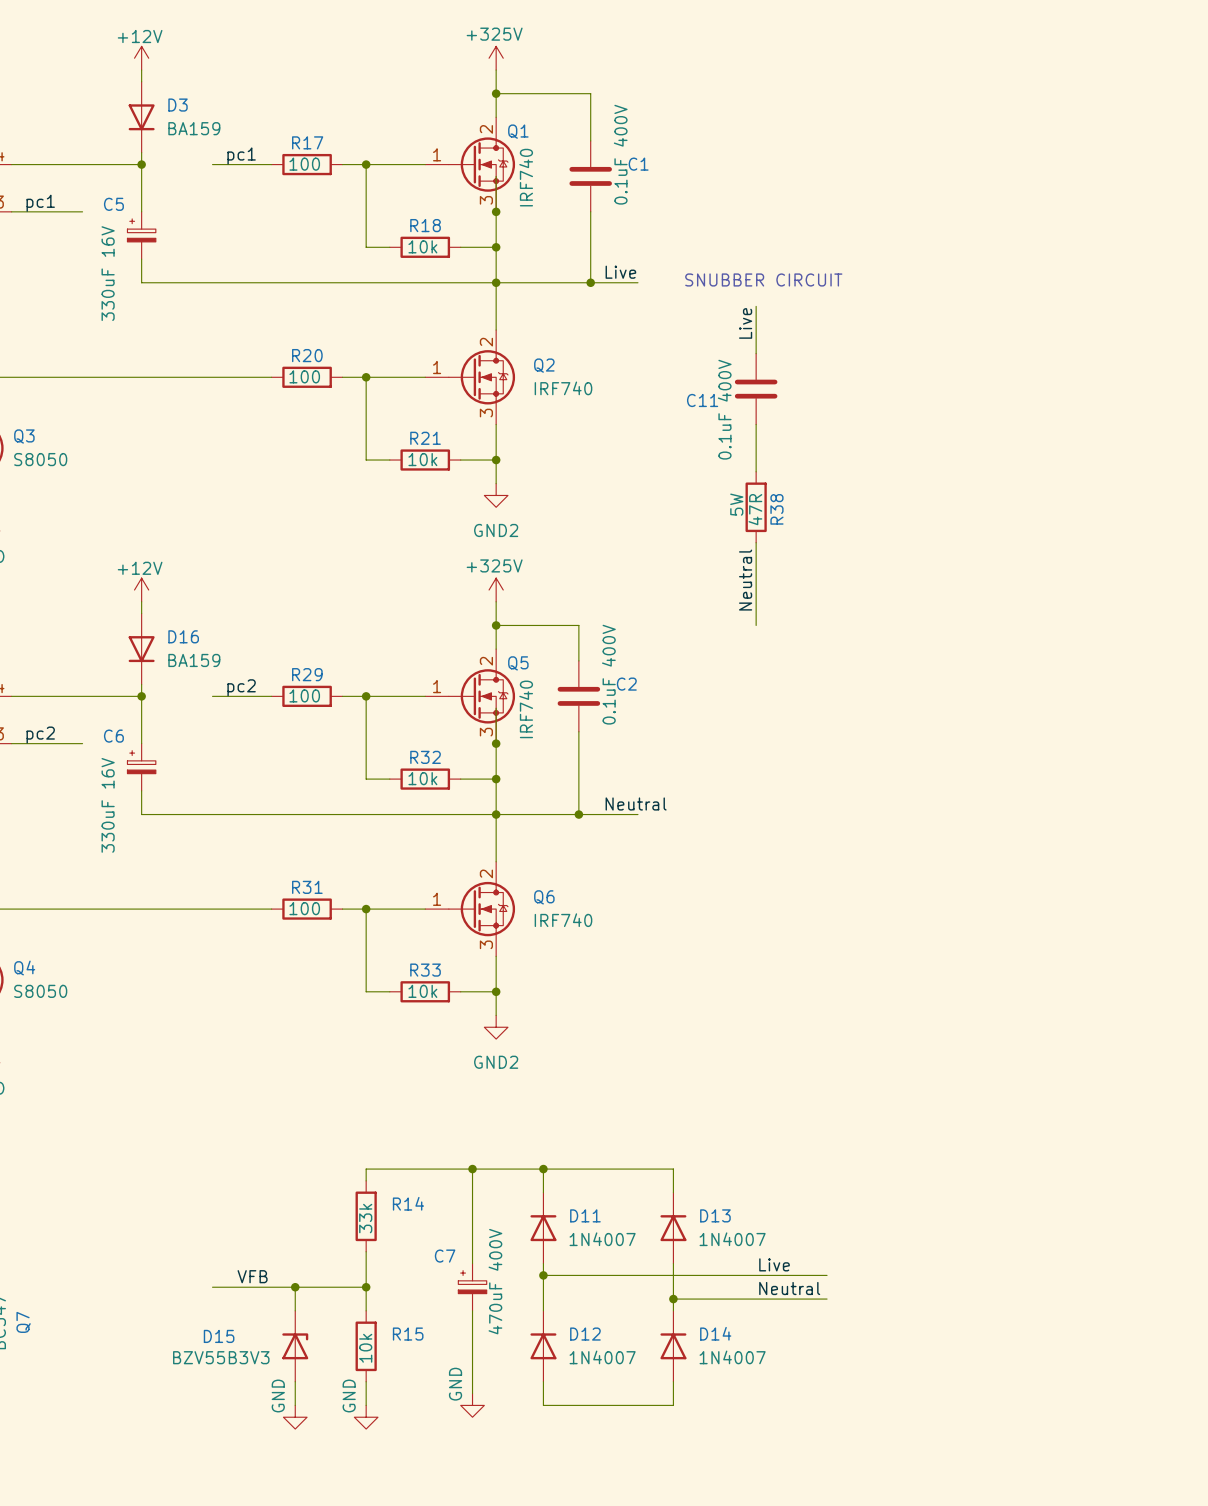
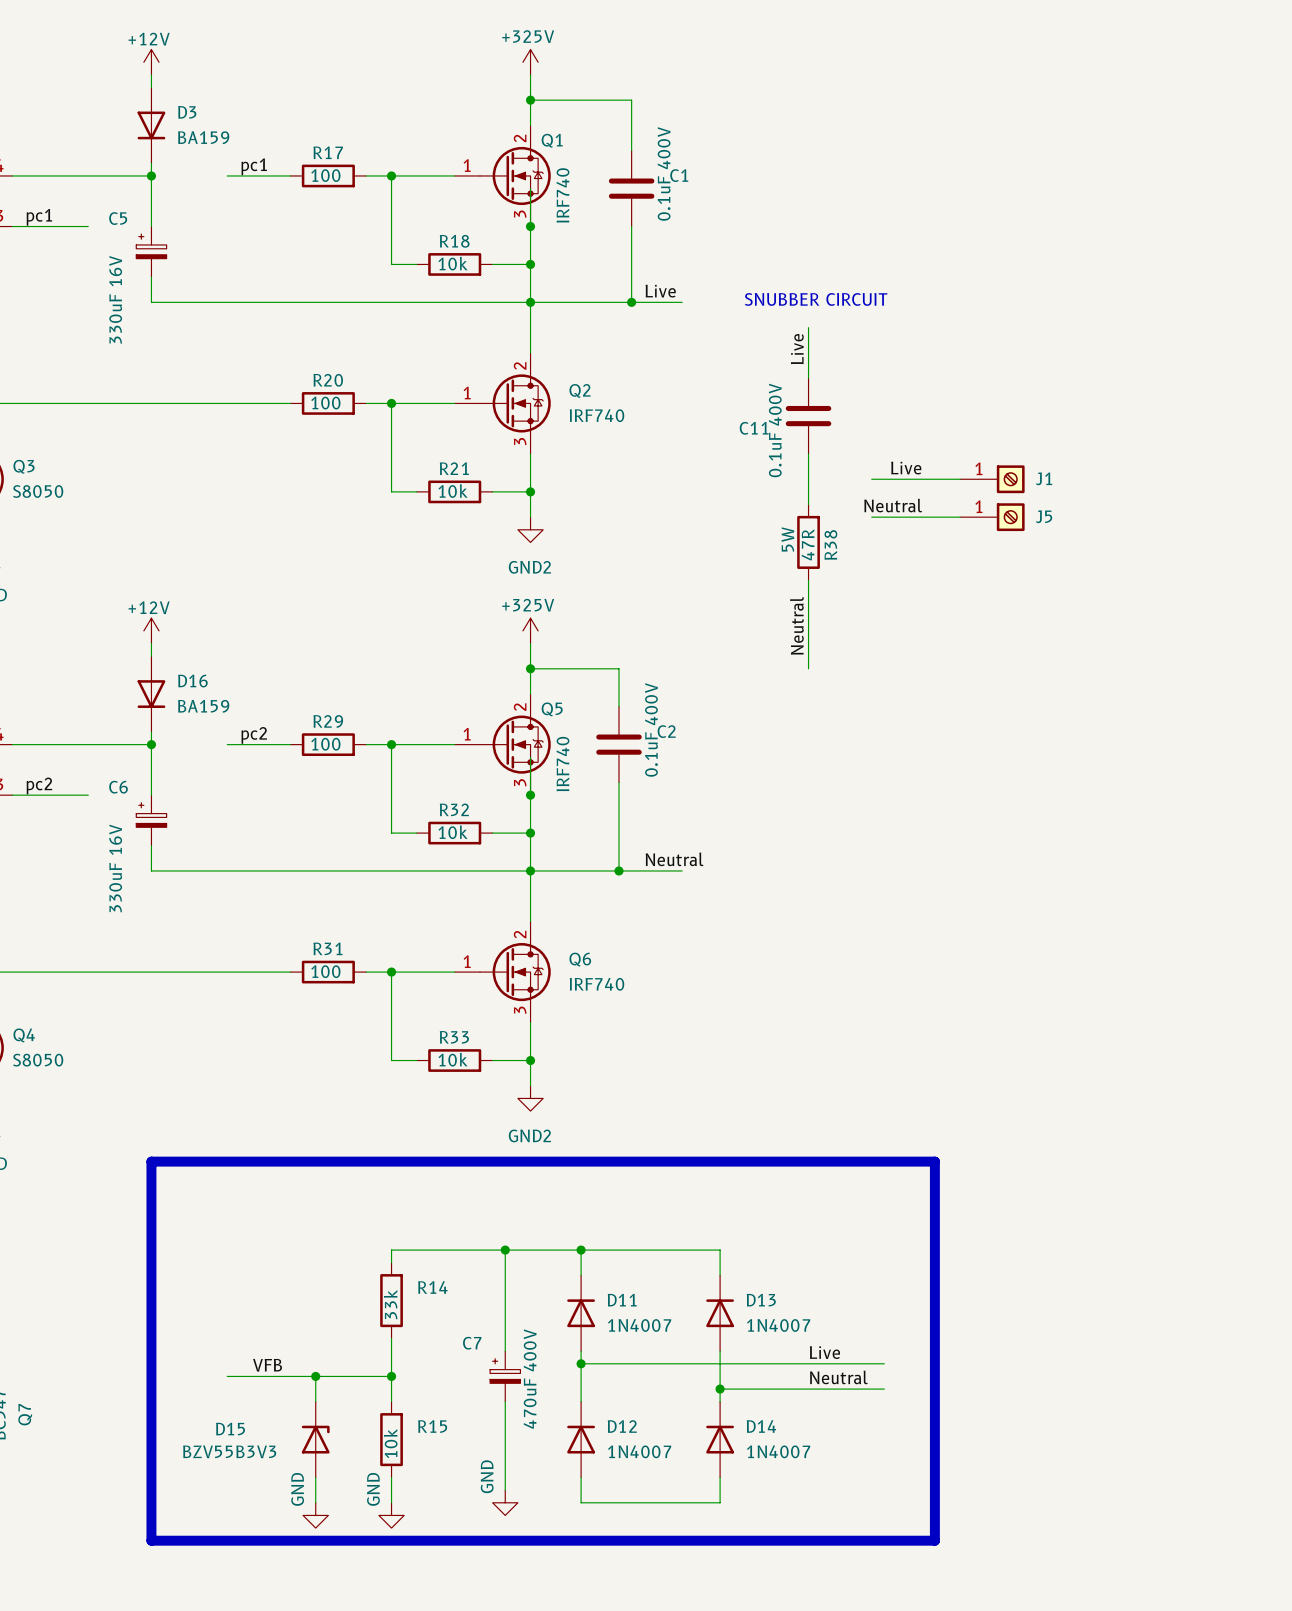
label: none -> Live (906, 468)
wire: none -> (871, 479) (960, 479)
J1: none -> (992, 479)
label: none -> Neutral (893, 505)
wire: none -> (871, 517) (960, 517)
J5: none -> (992, 517)
line: none -> (151, 1161) (934, 1161) (934, 1540) (151, 1540) (151, 1161)

